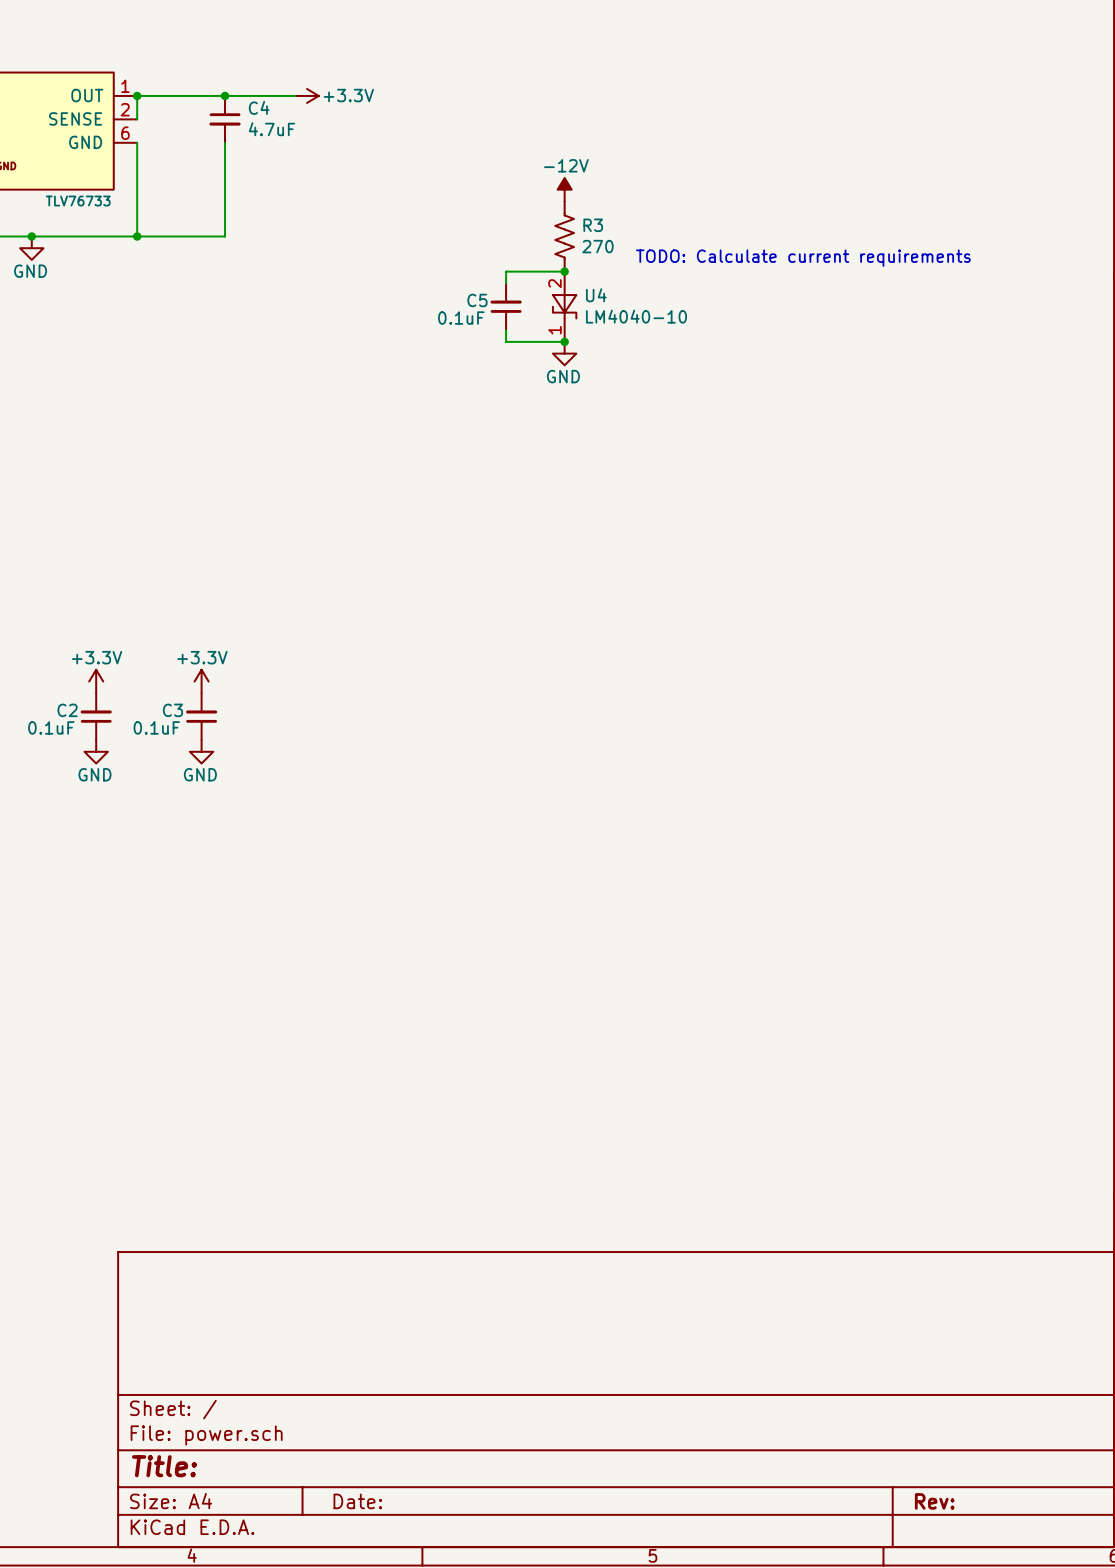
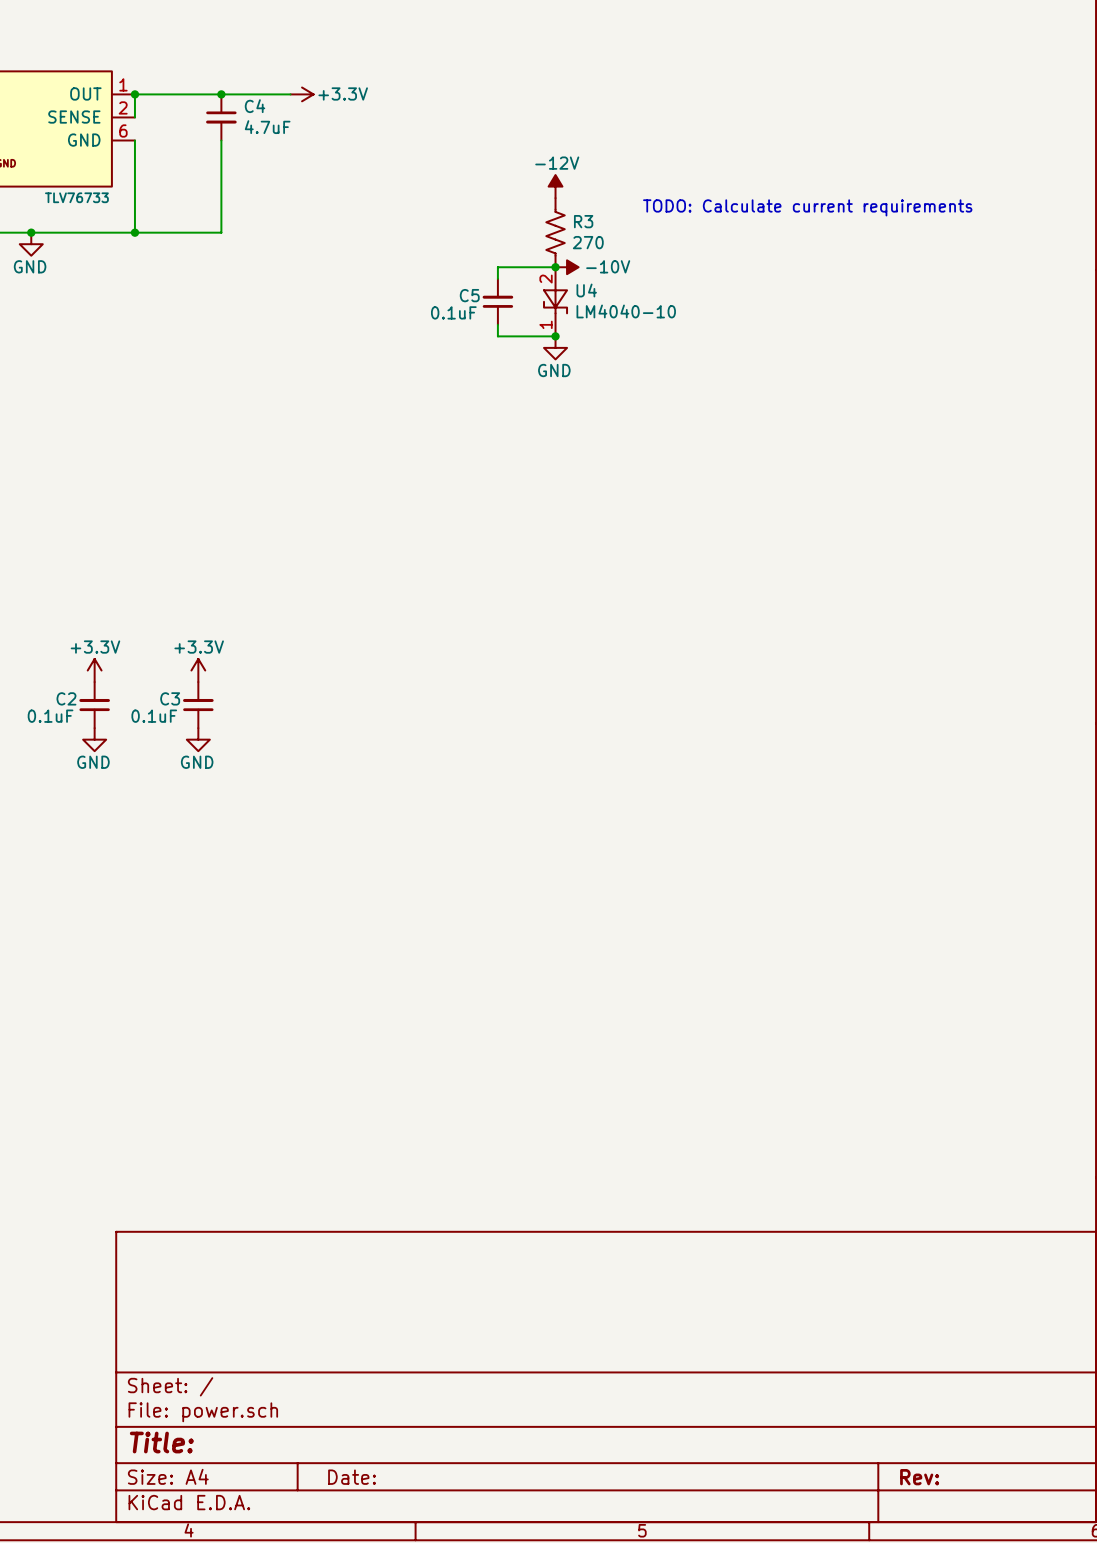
text position: TODO: Calculate current requirements (803, 258) -> TODO: Calculate current requirements (807, 207)
power symbol: none -> -10V (567, 267)

